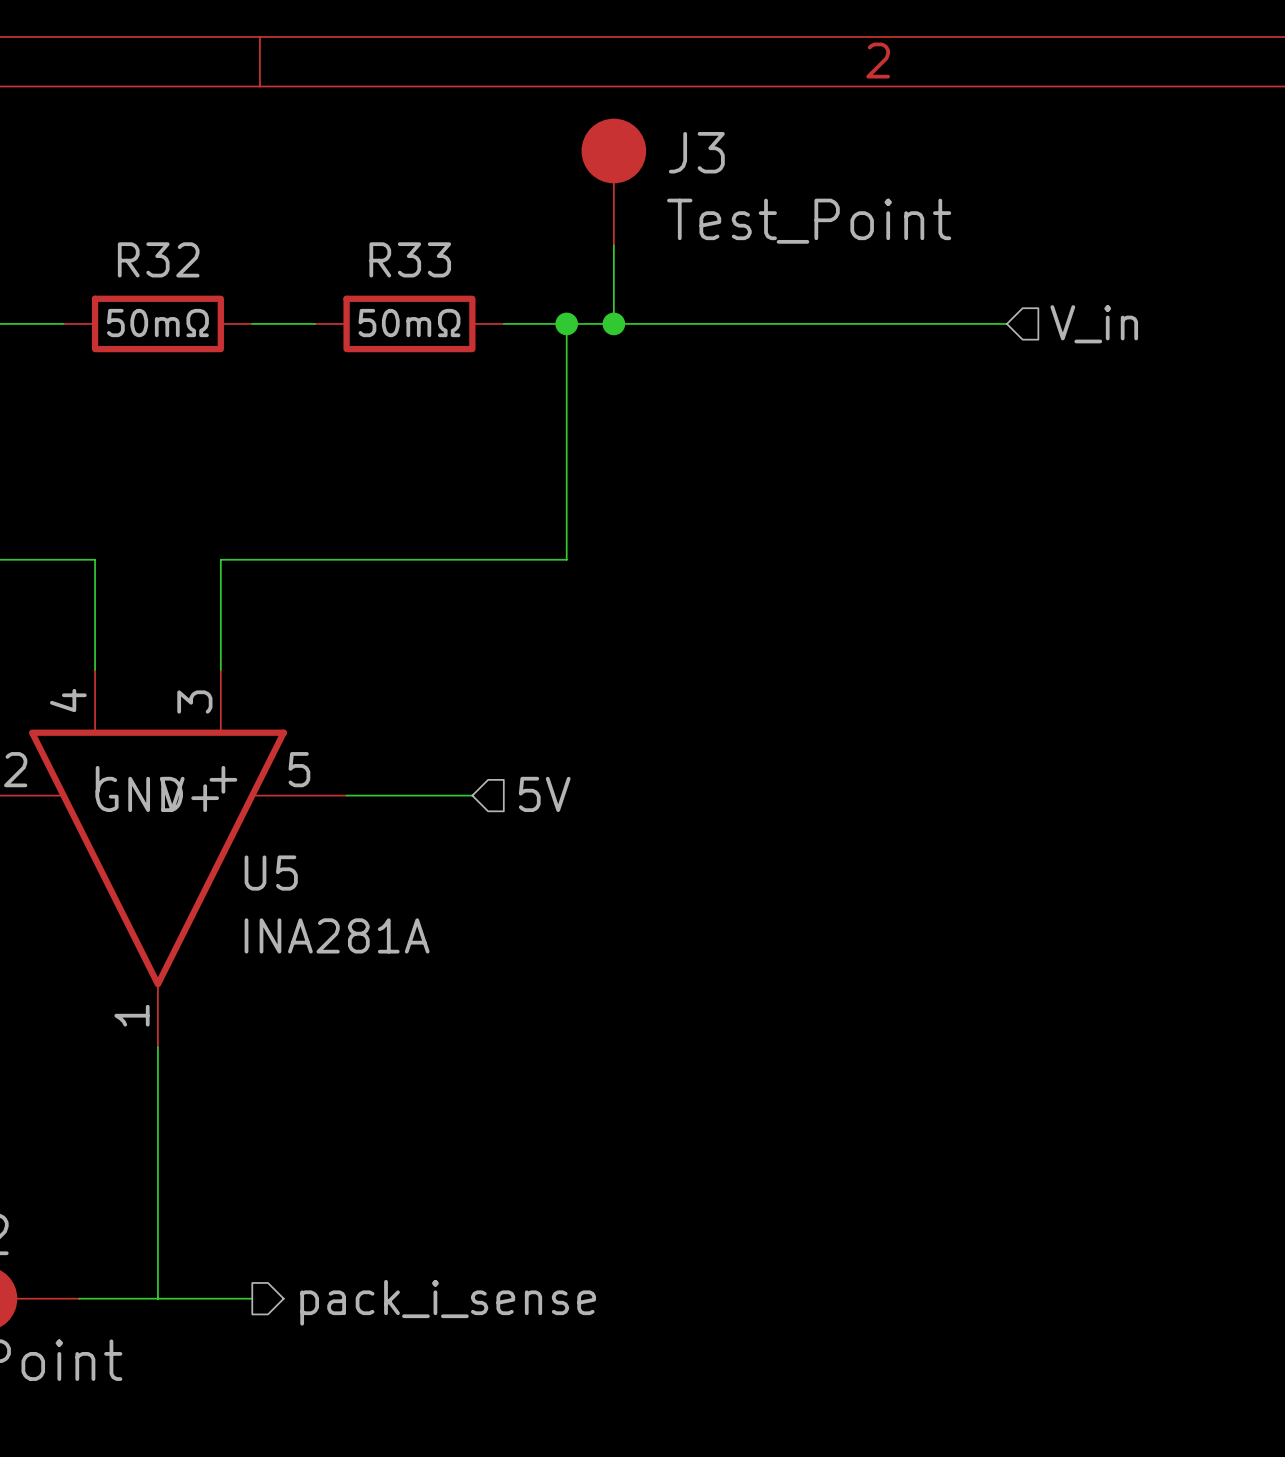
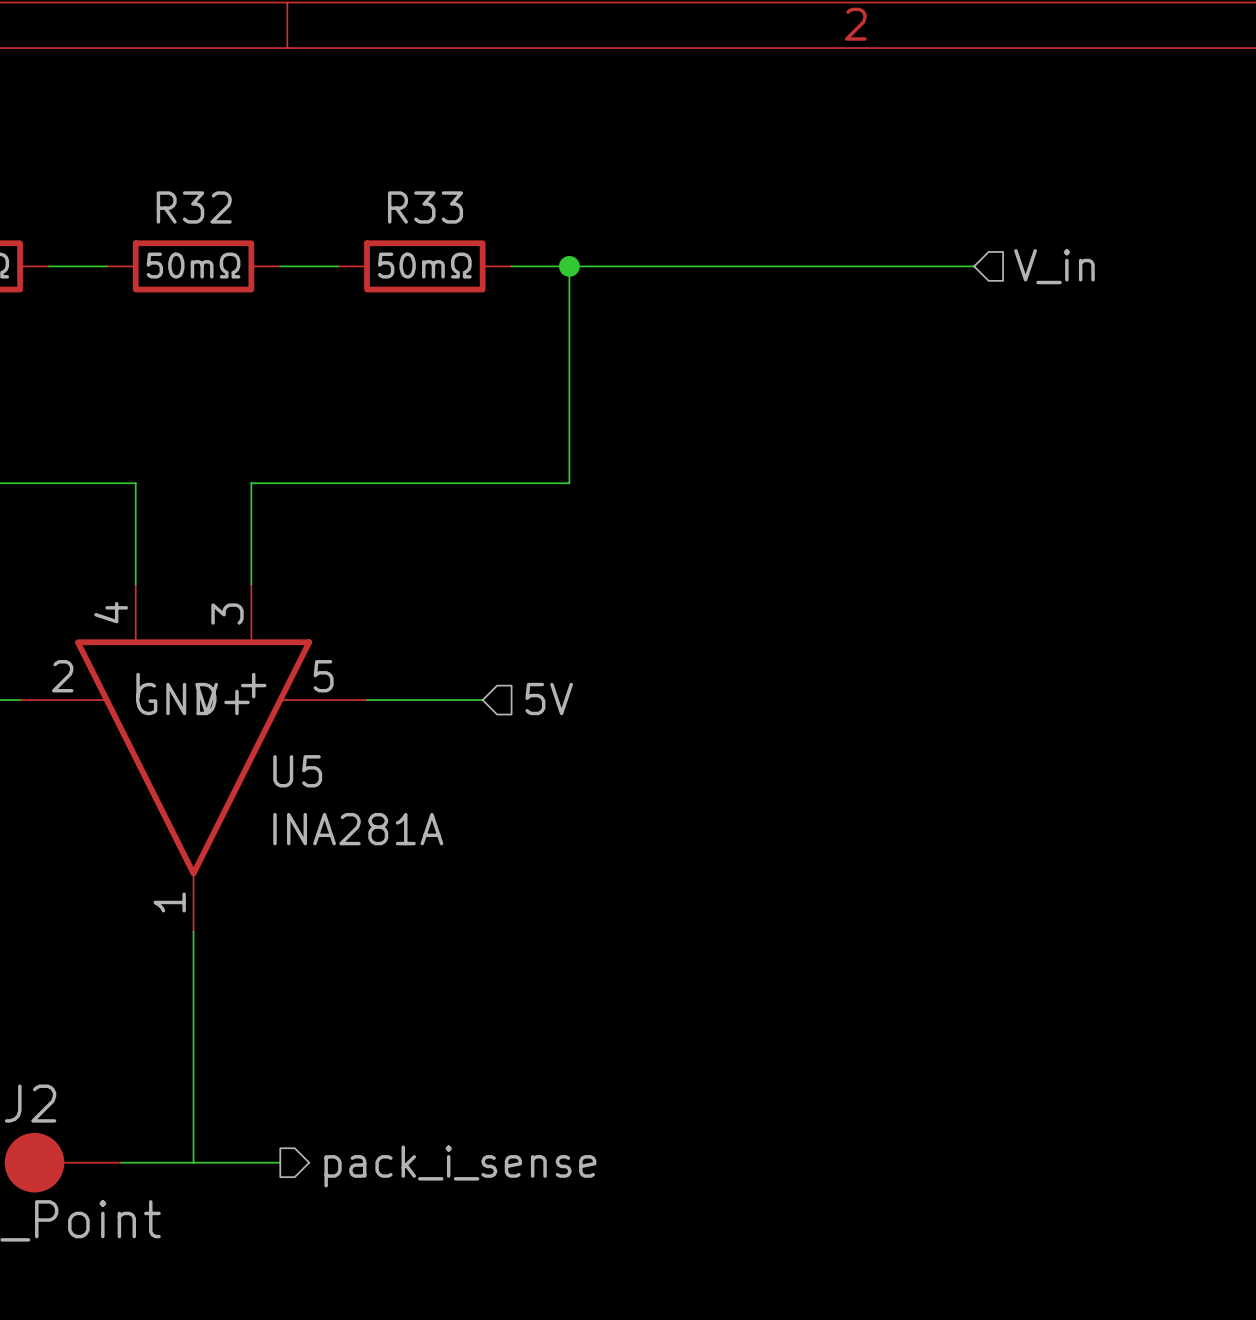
J3: Test_Point (613, 182) -> none
wire: (613, 245) (613, 323) -> none
junction: (613, 323) -> none

